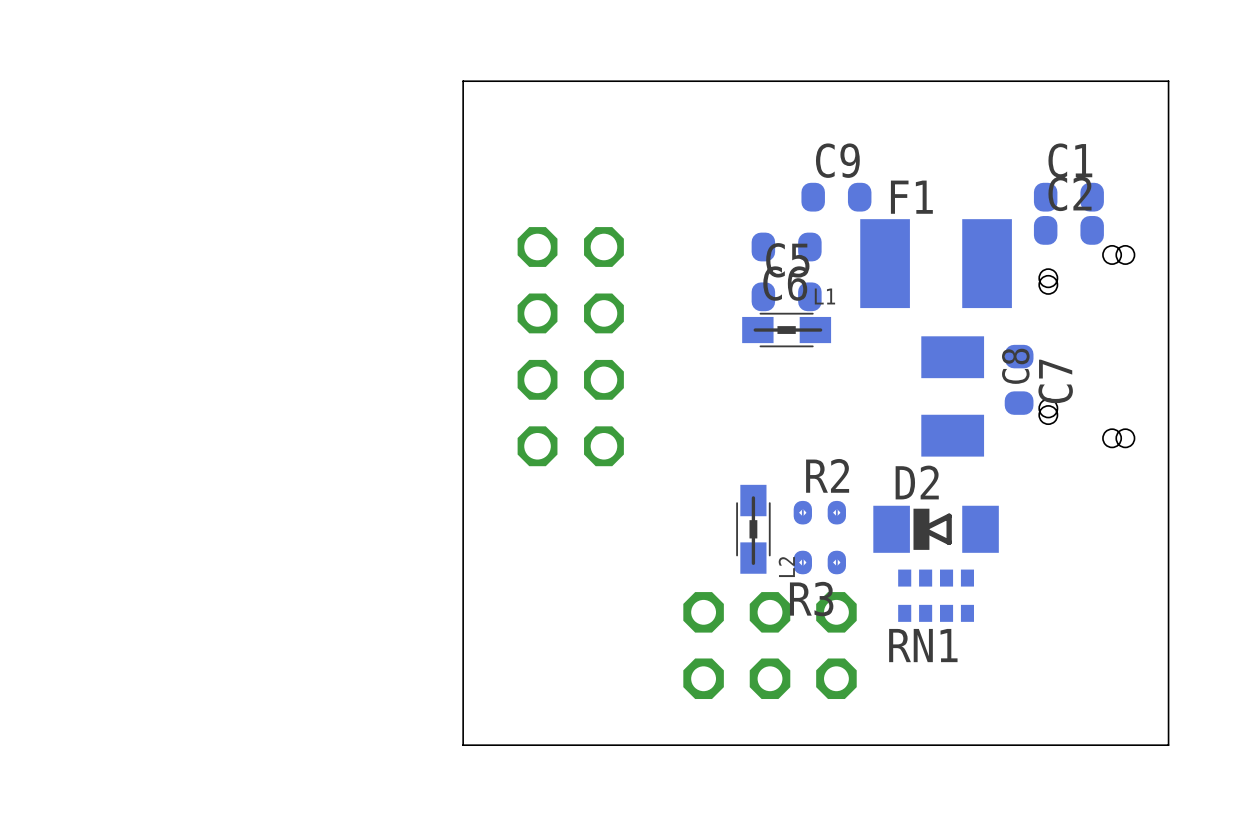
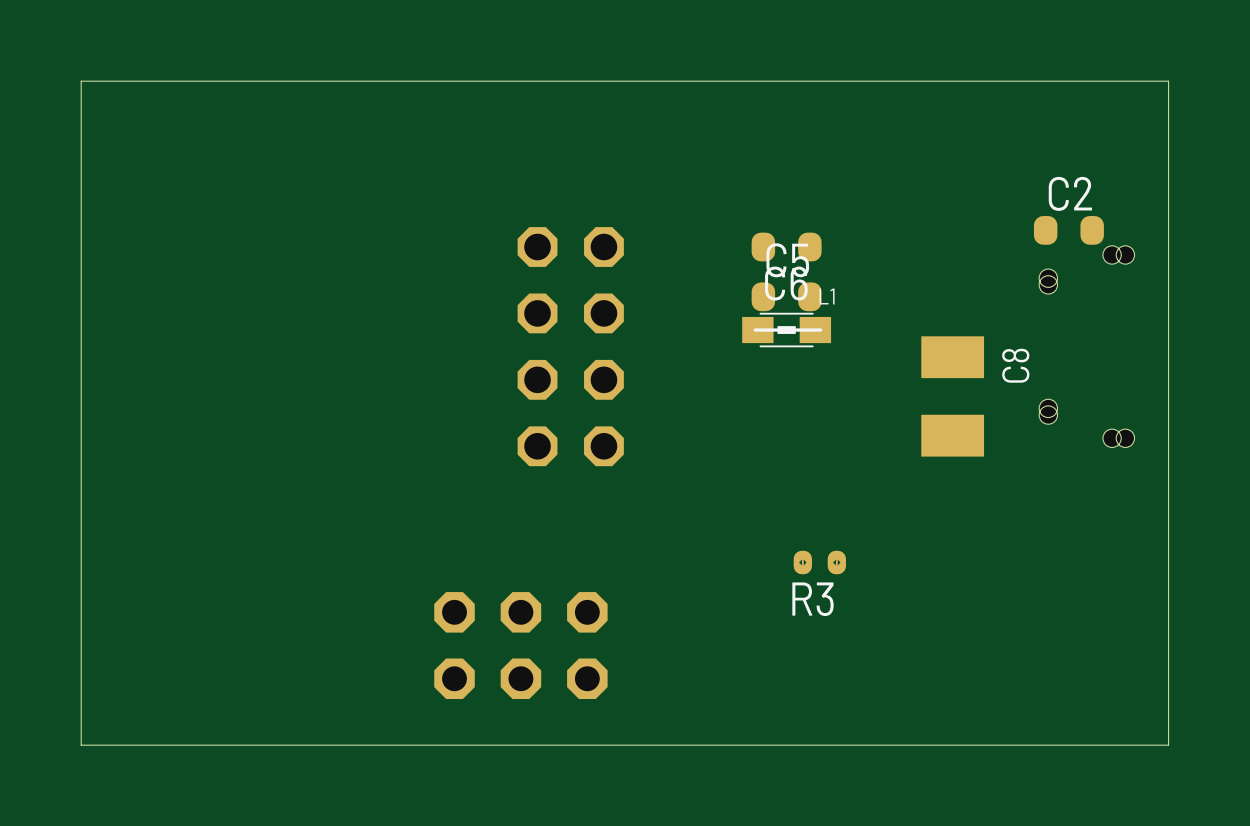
board edge: (463, 81) (463, 745) -> (463, 81) (81, 81) (81, 745) (463, 745)
C9: (836, 197) -> none
C1: (1068, 197) -> none
F1: (936, 263) -> none
C7: (1019, 379) -> none
R2: (819, 512) -> none
L2: (753, 529) -> none
D2: (936, 529) -> none
RN1: (936, 595) -> none
part position: (770, 645) -> (520, 645)

